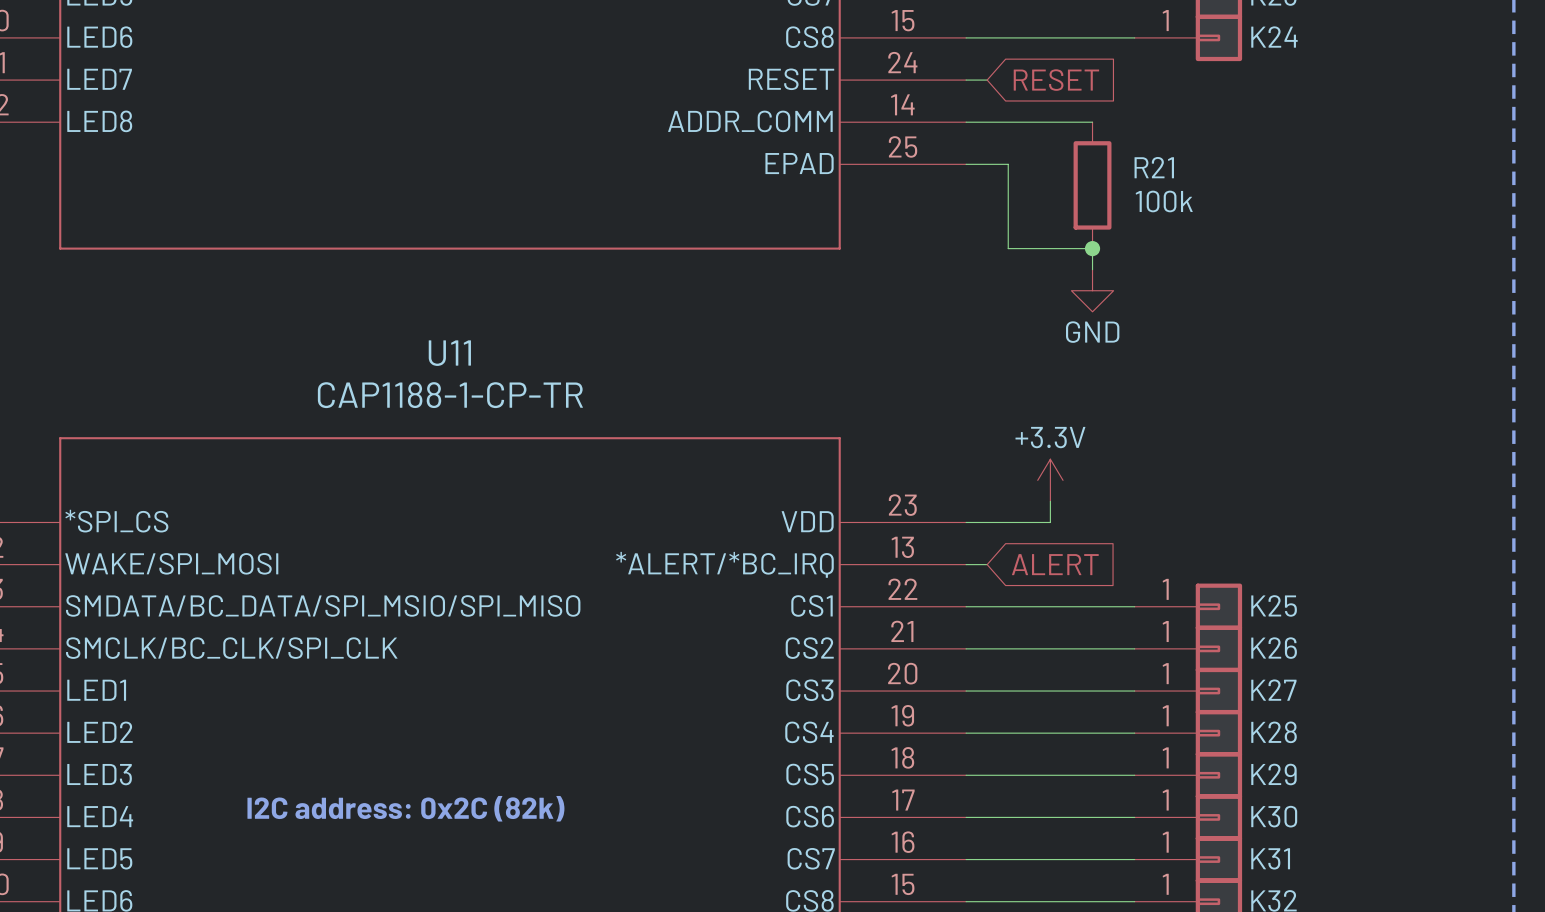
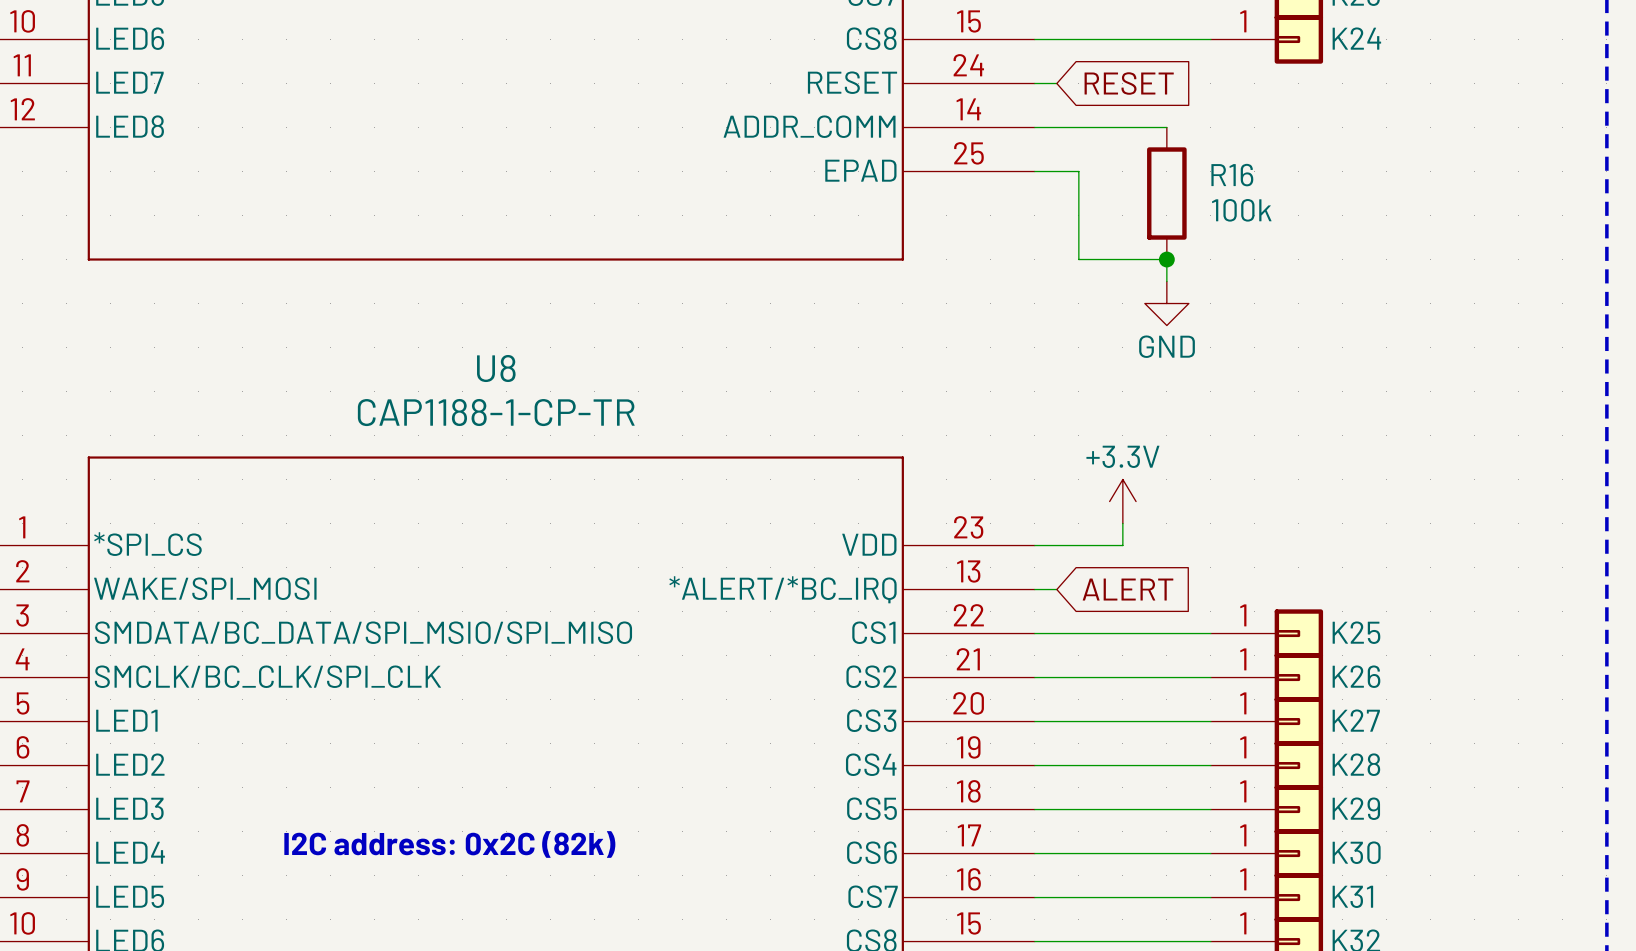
R21 name: R21 (1154, 167) -> R16 (1232, 175)
U11 name: U11 (449, 353) -> U8 (496, 368)

